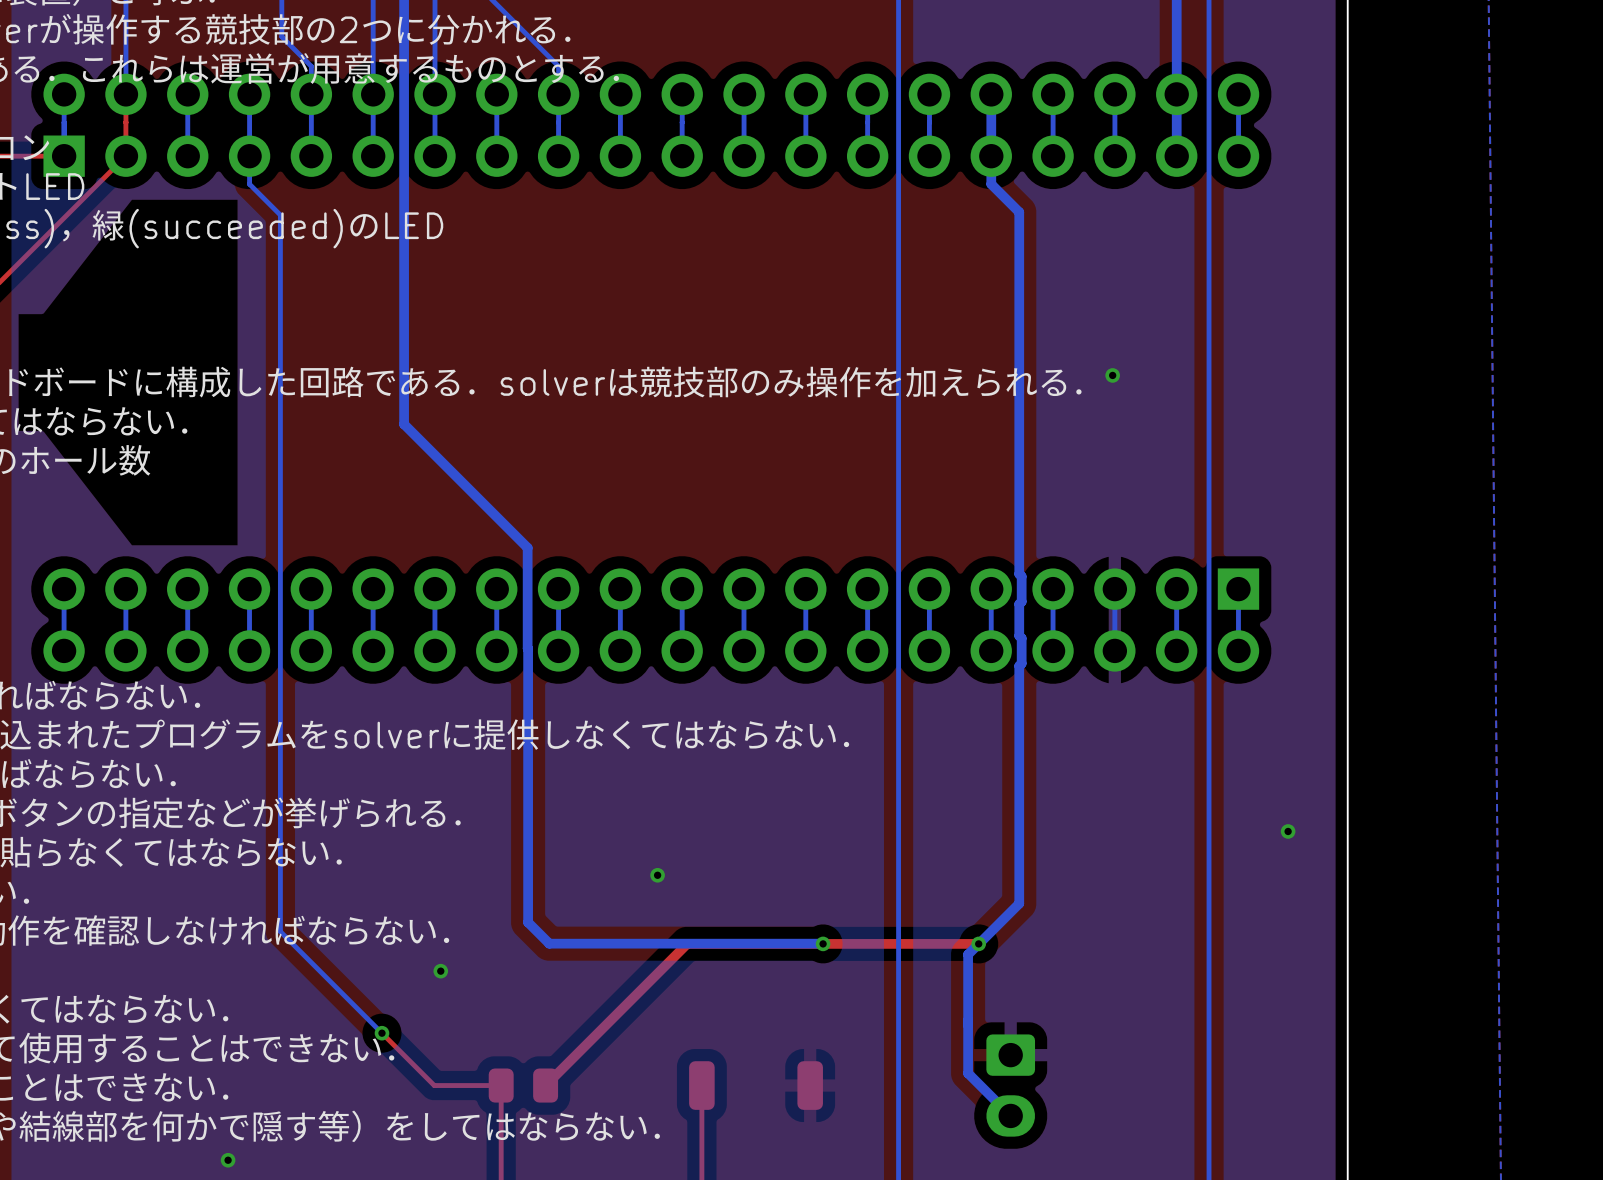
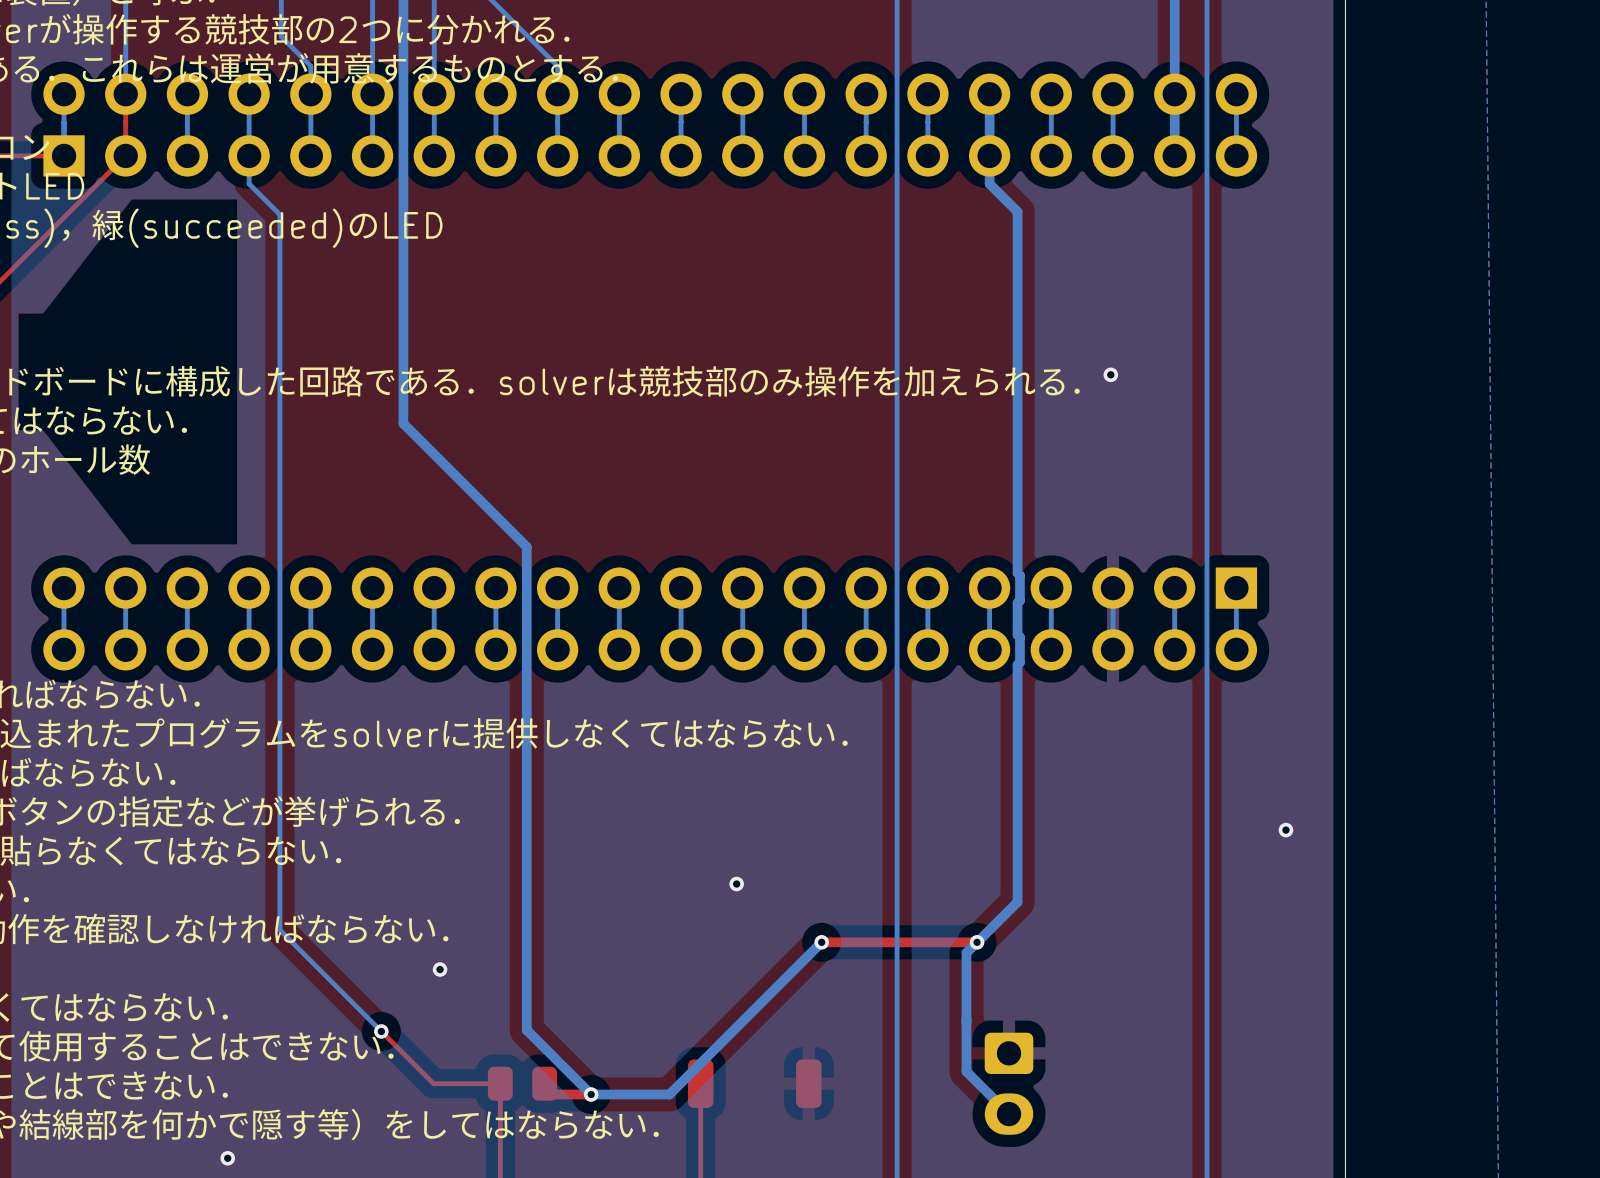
bottom track: (527, 648) (528, 922) (549, 943) (822, 943) -> (526, 647) (526, 1030) (591, 1094) (669, 1094) (821, 942)
via position: (657, 875) -> (736, 884)
top track: (823, 943) (687, 943) (545, 1085) -> (591, 1094) (555, 1094) (544, 1083)
via: none -> (591, 1094)

